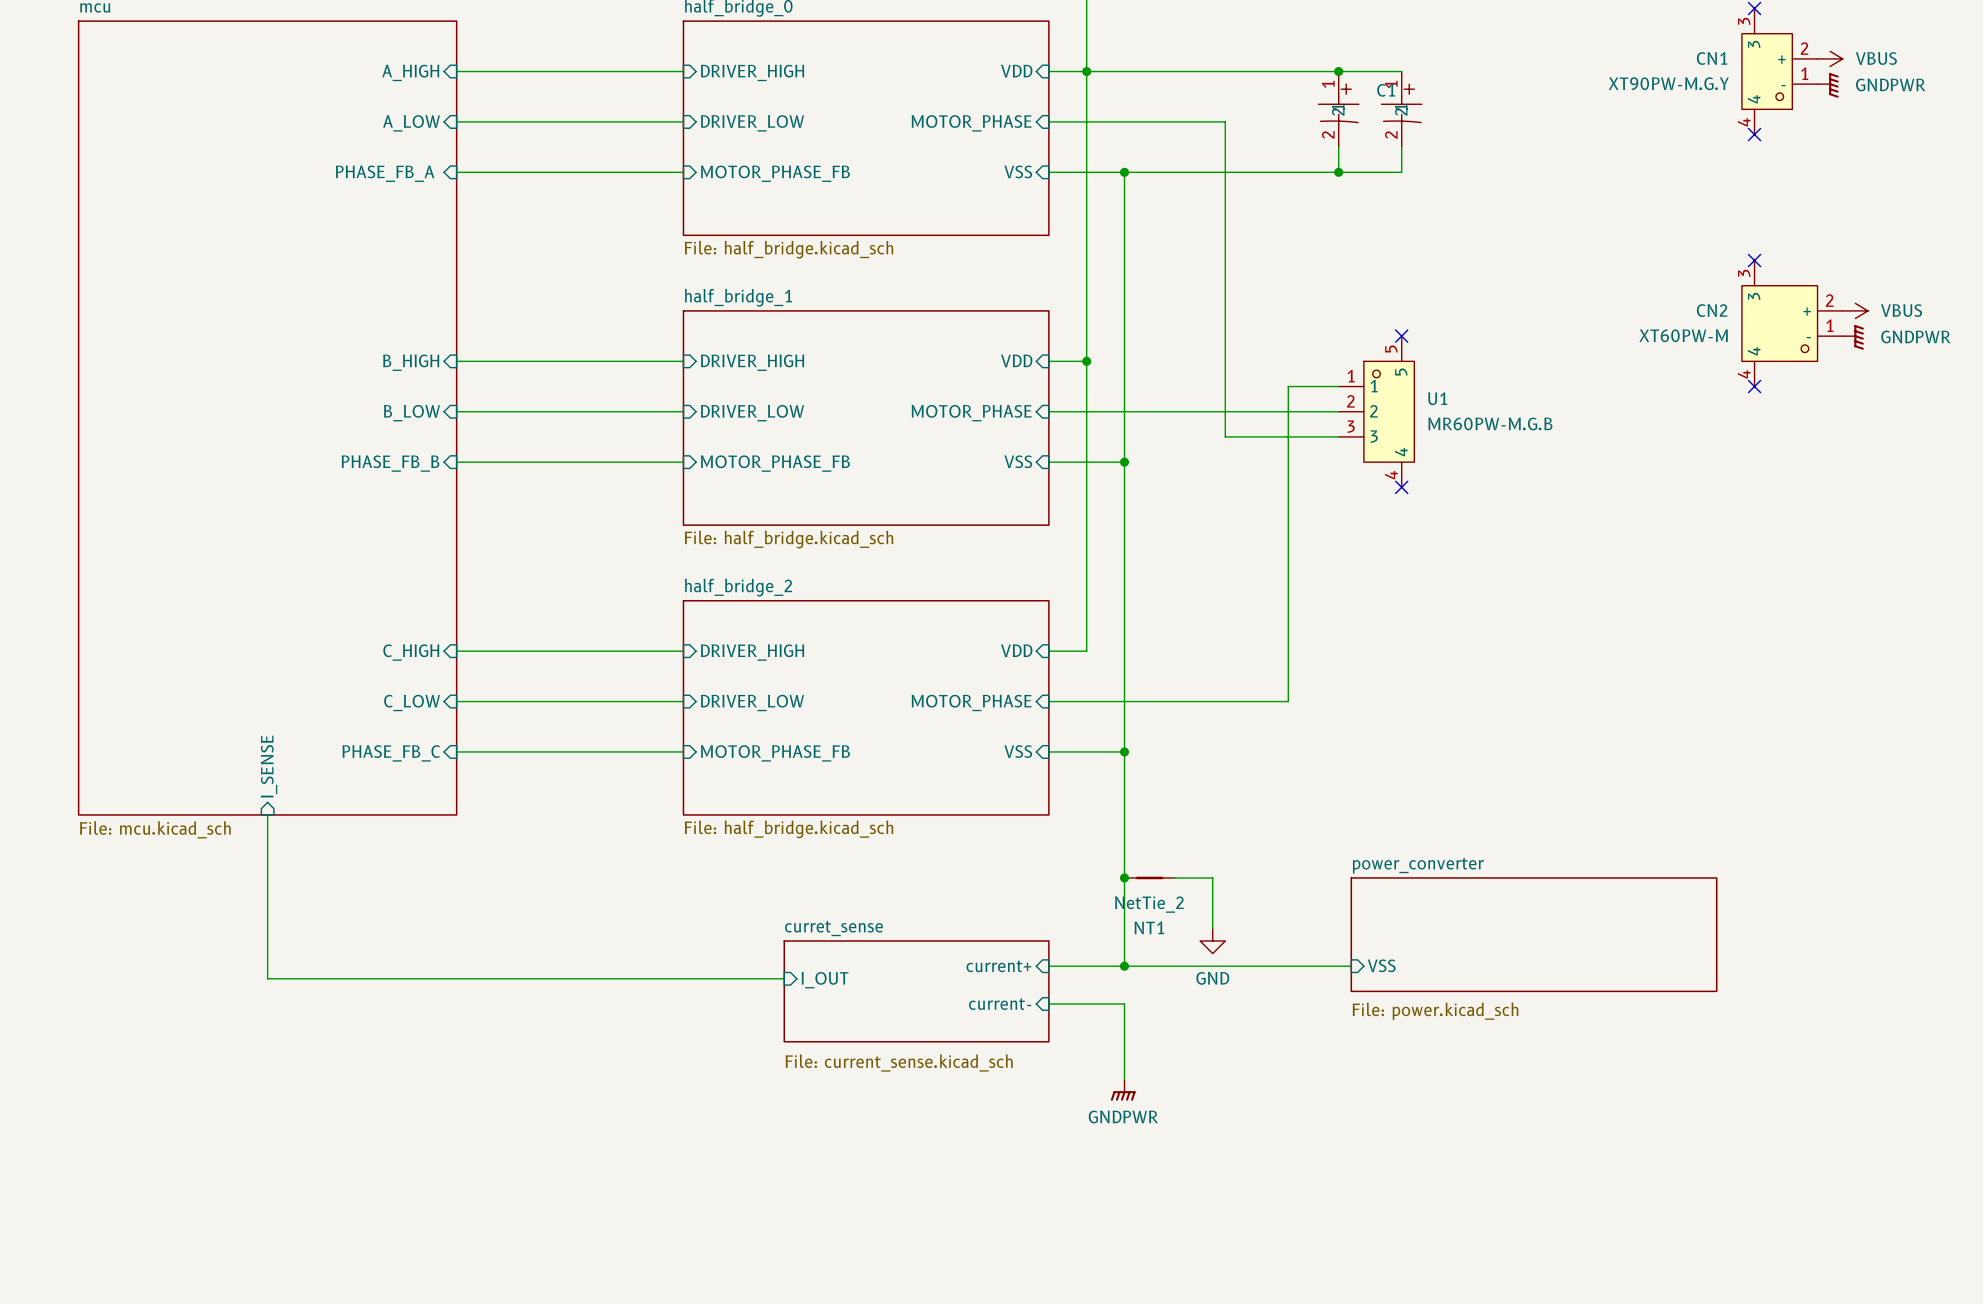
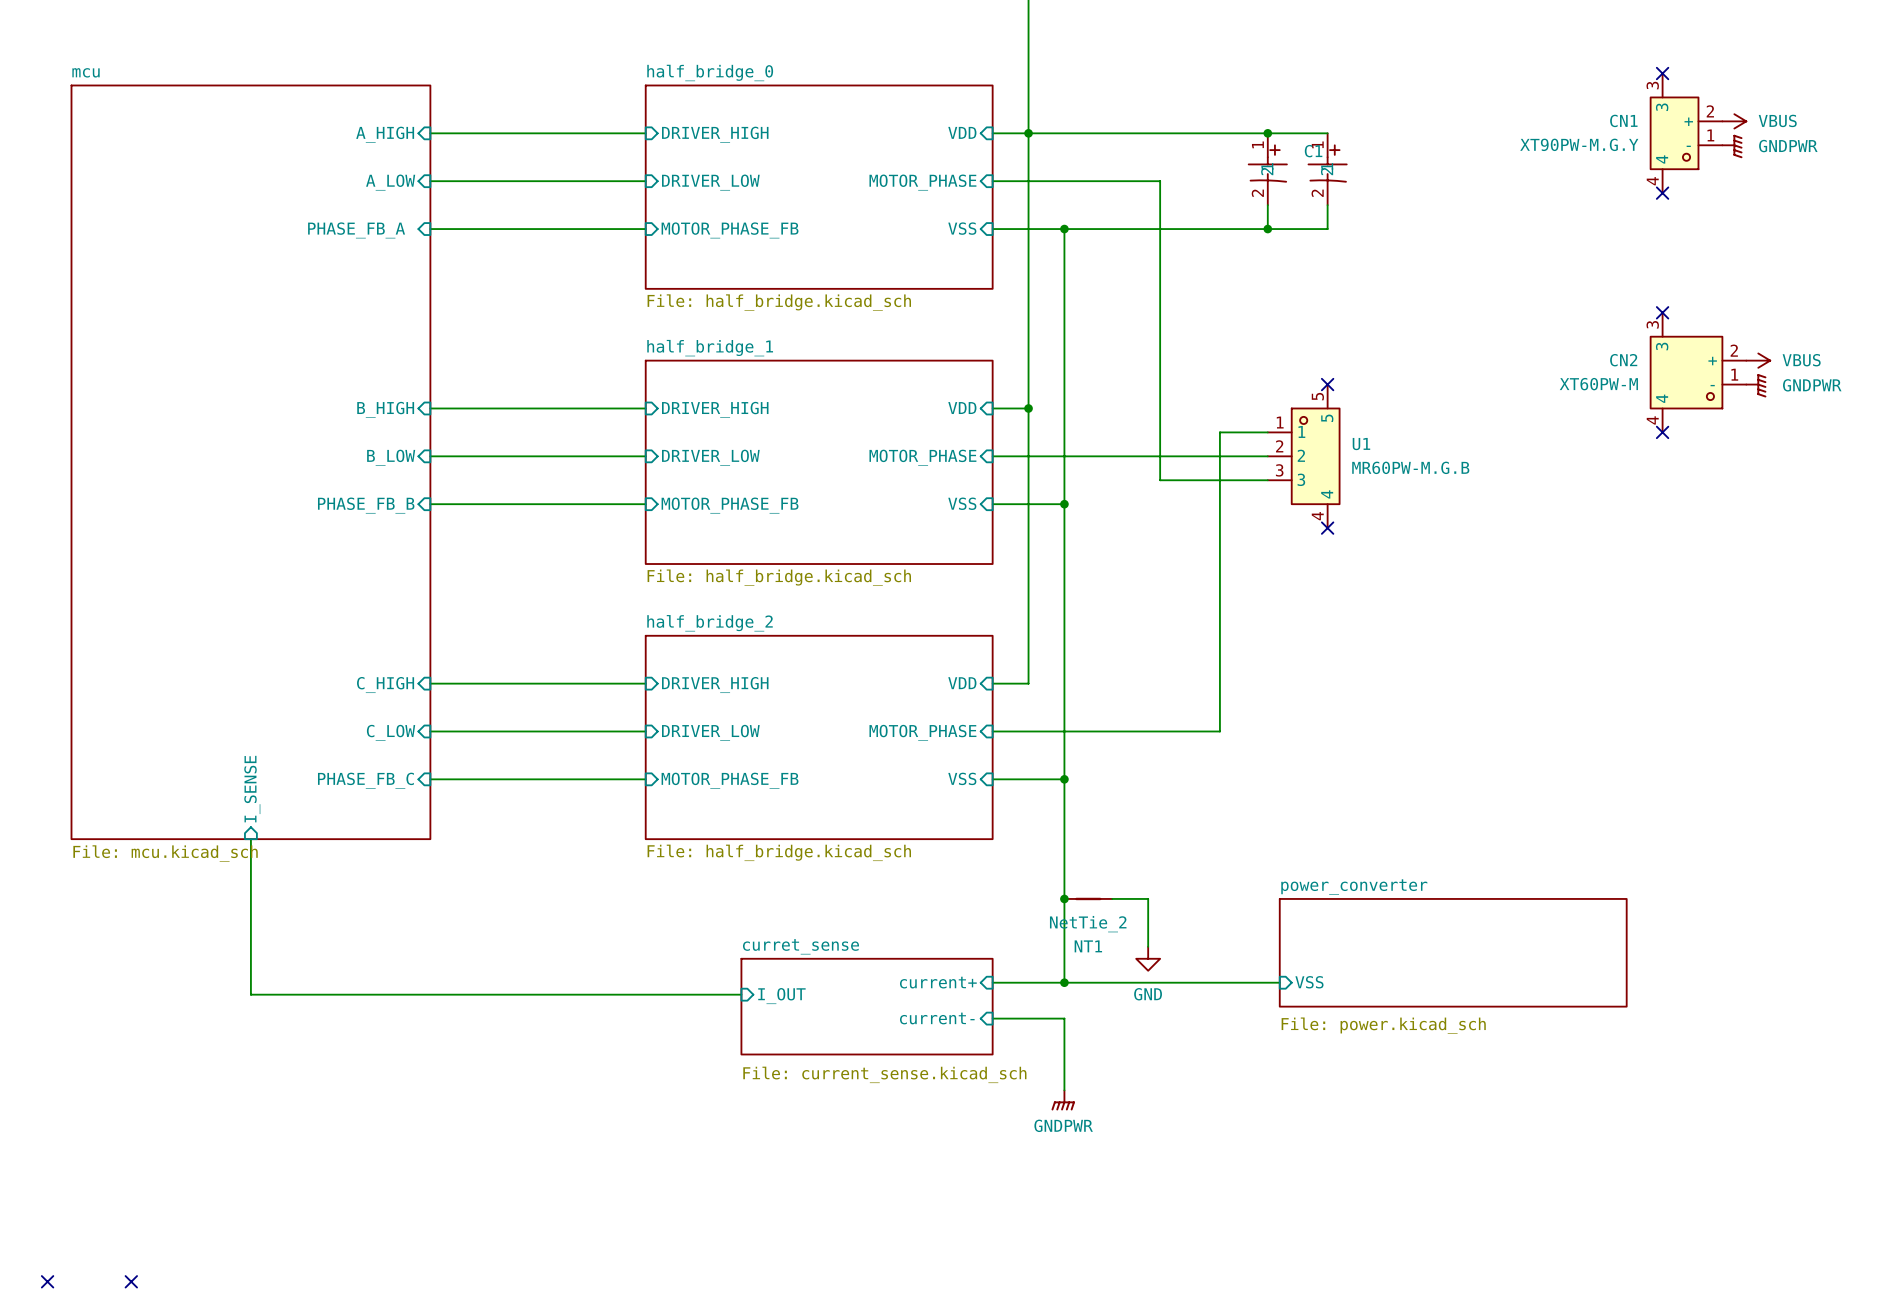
no-connect mark: none -> (47, 1281)
no-connect mark: none -> (131, 1281)

